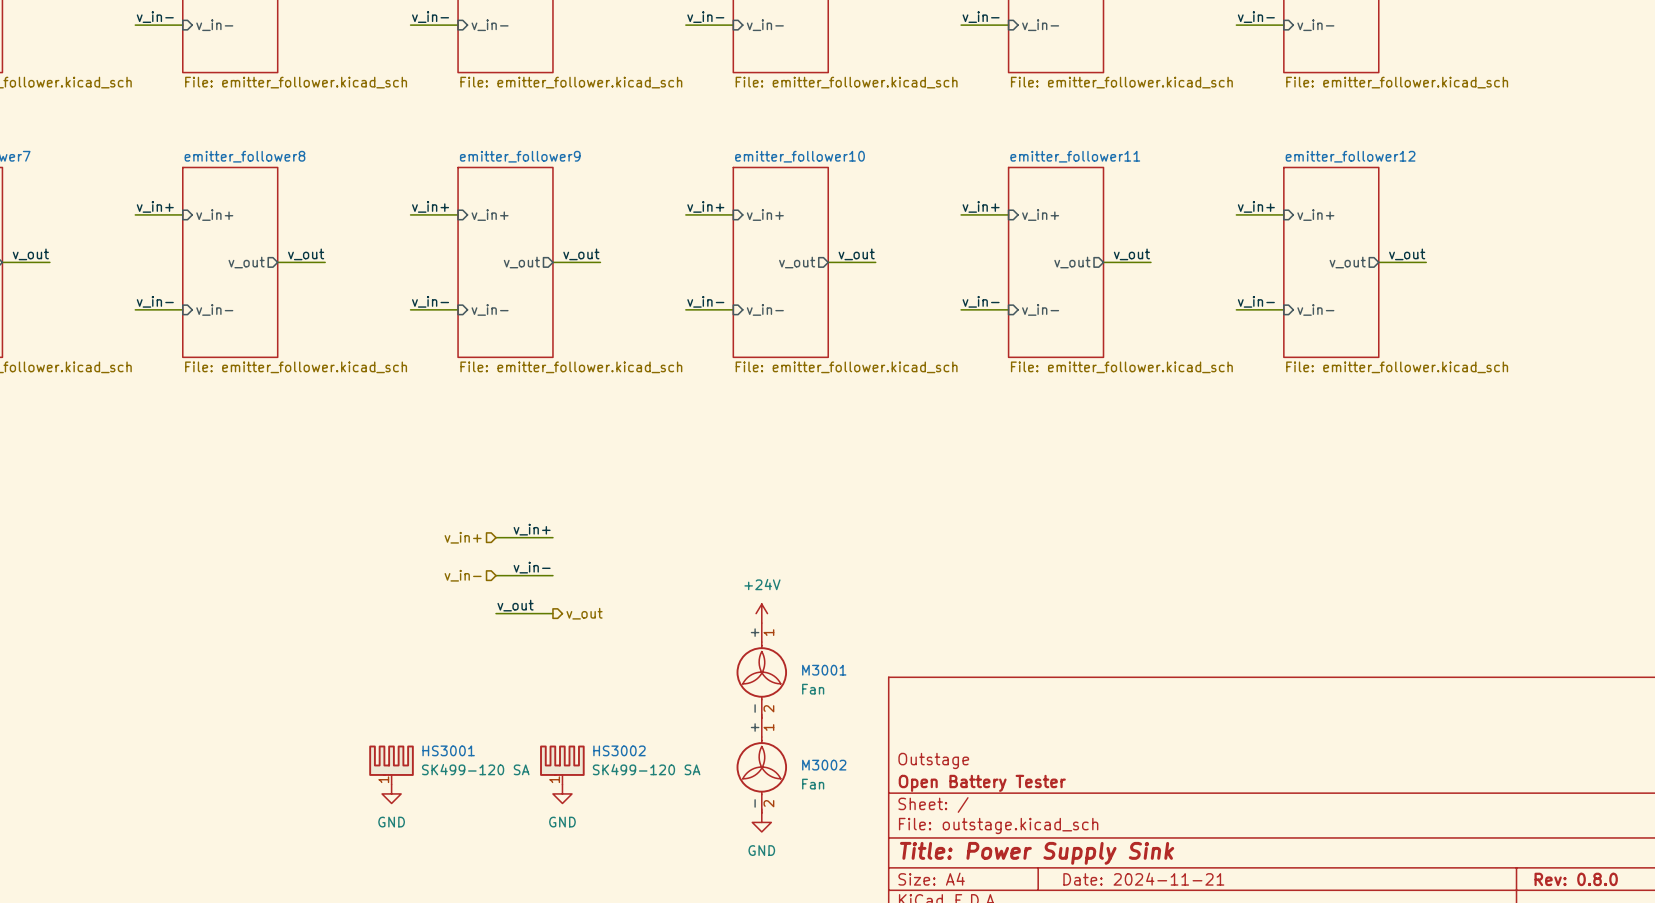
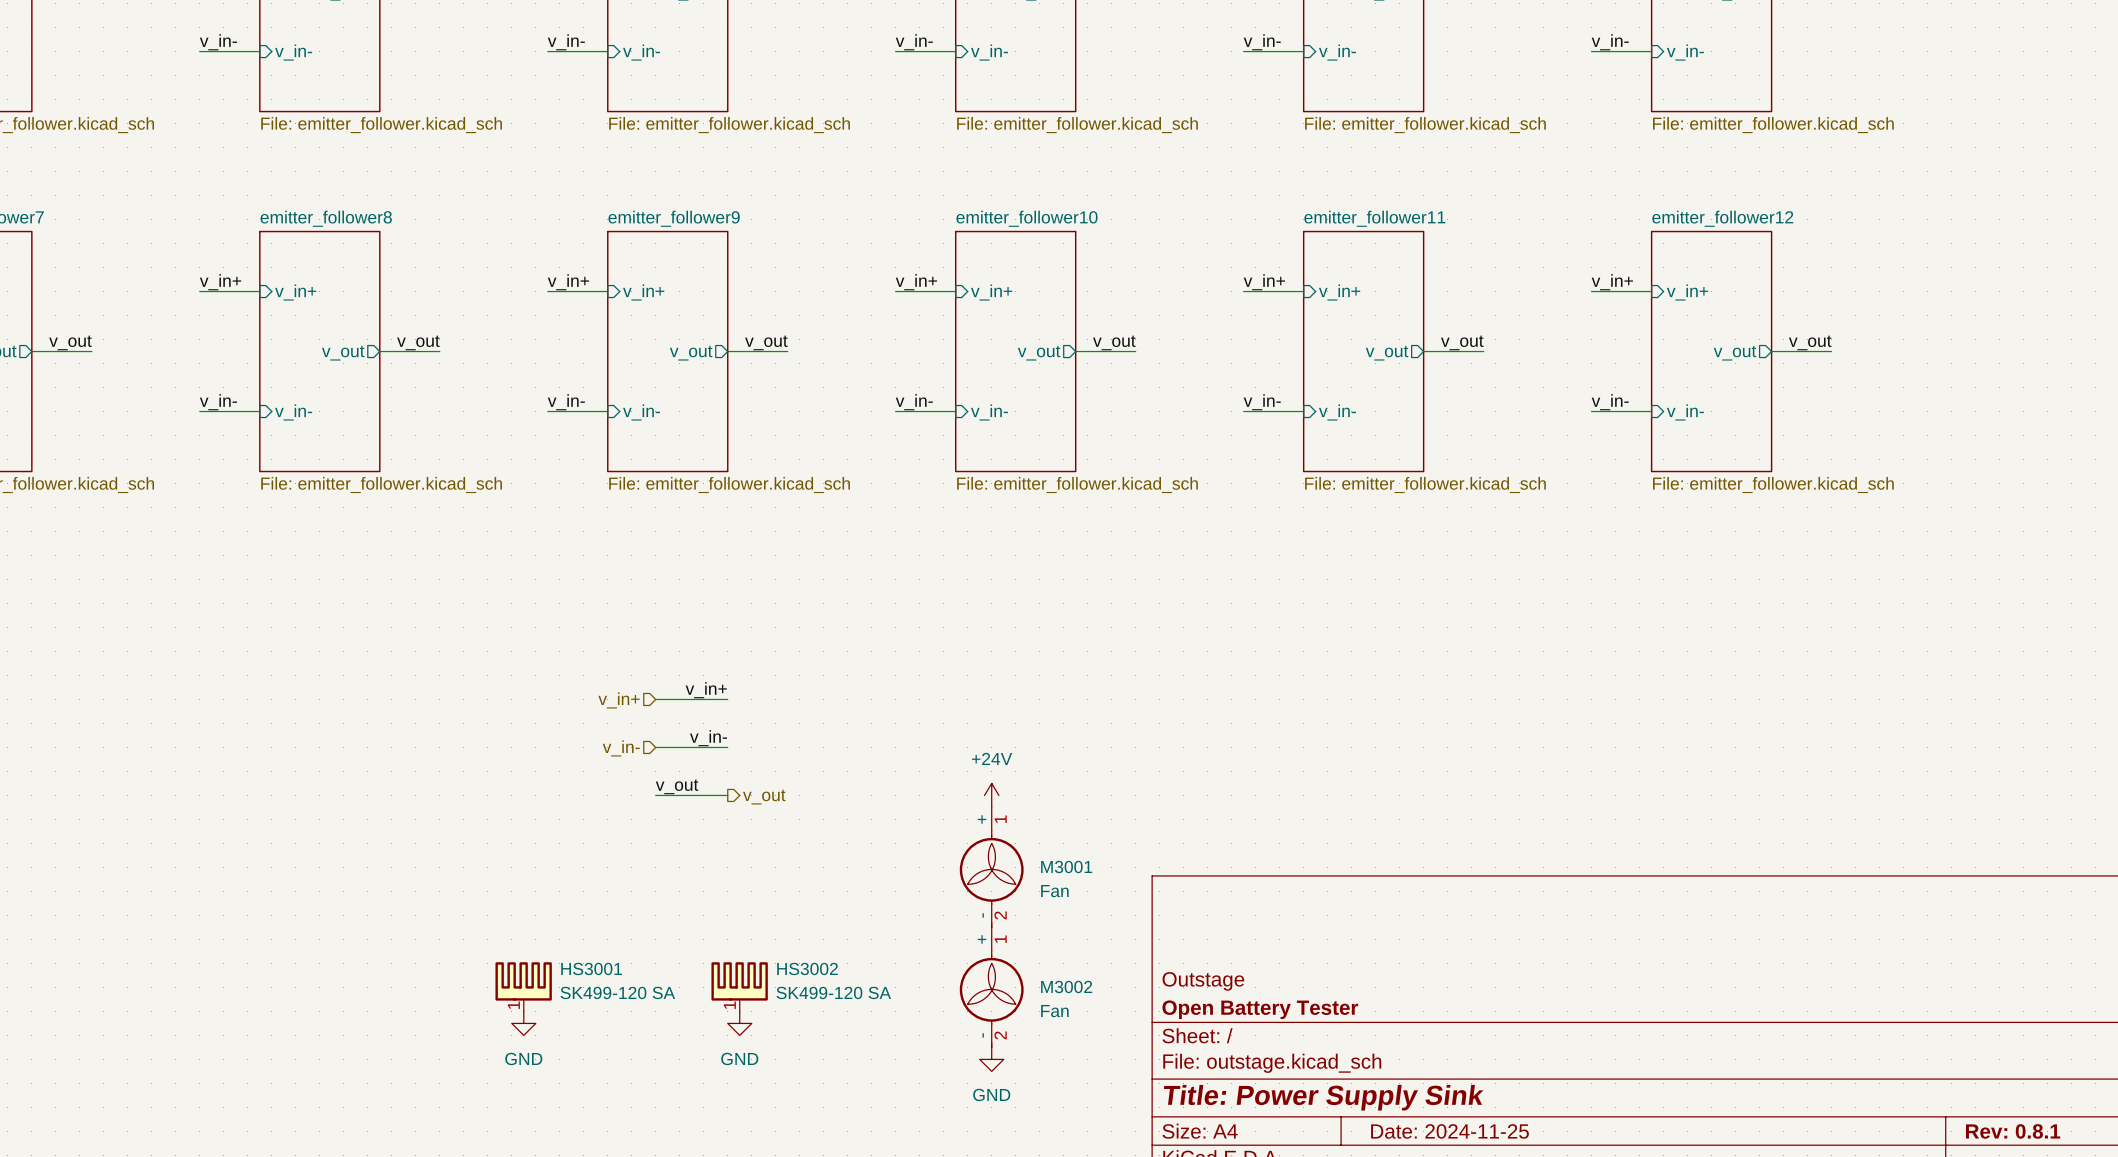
title block: Date: 2024-11-21 (1143, 879) -> Date: 2024-11-25 (1449, 1131)
title block: Rev: 0.8.0 (1576, 879) -> Rev: 0.8.1 (2013, 1131)

